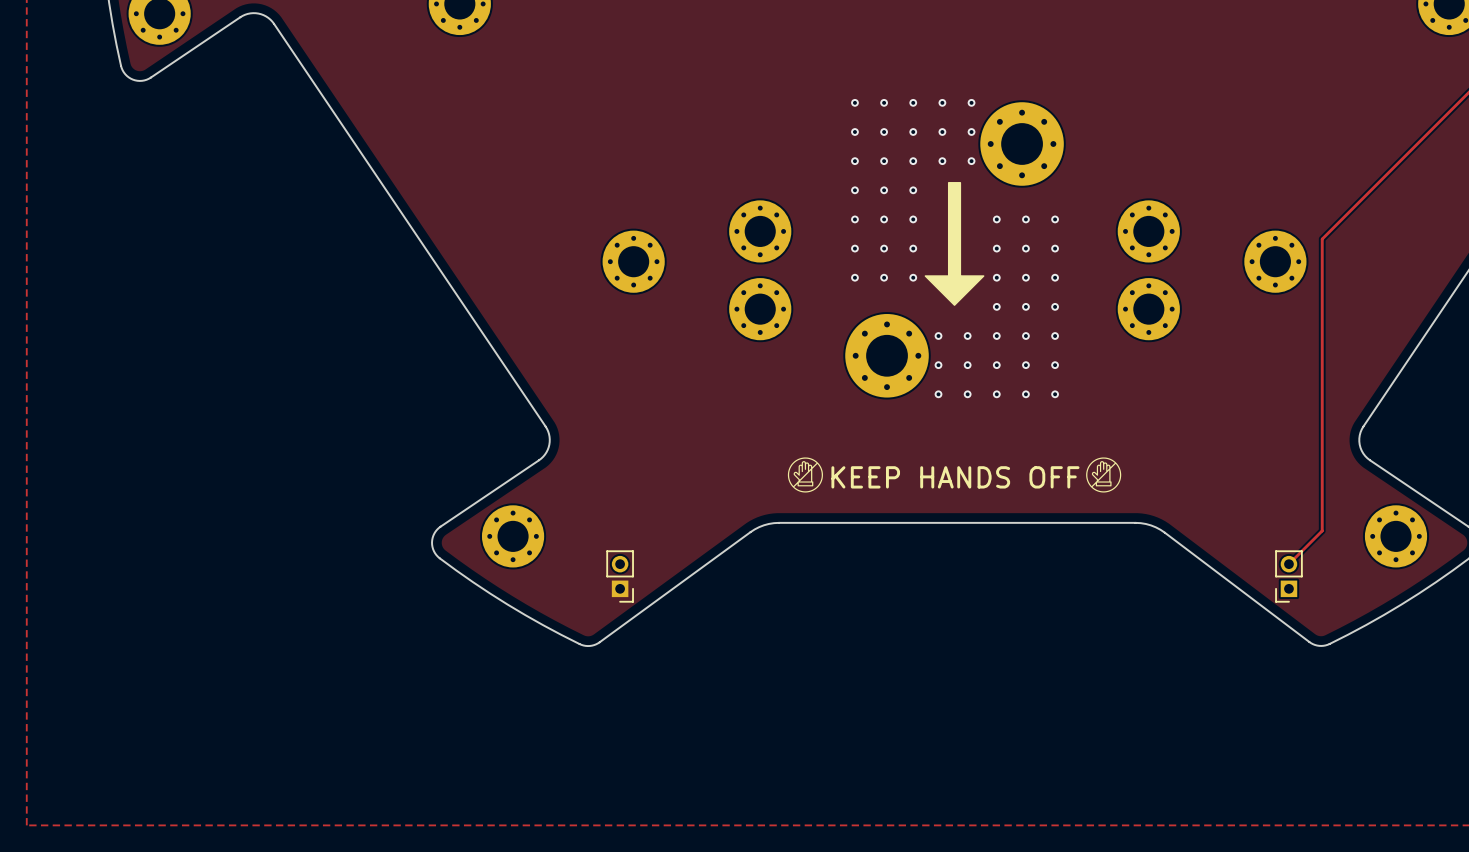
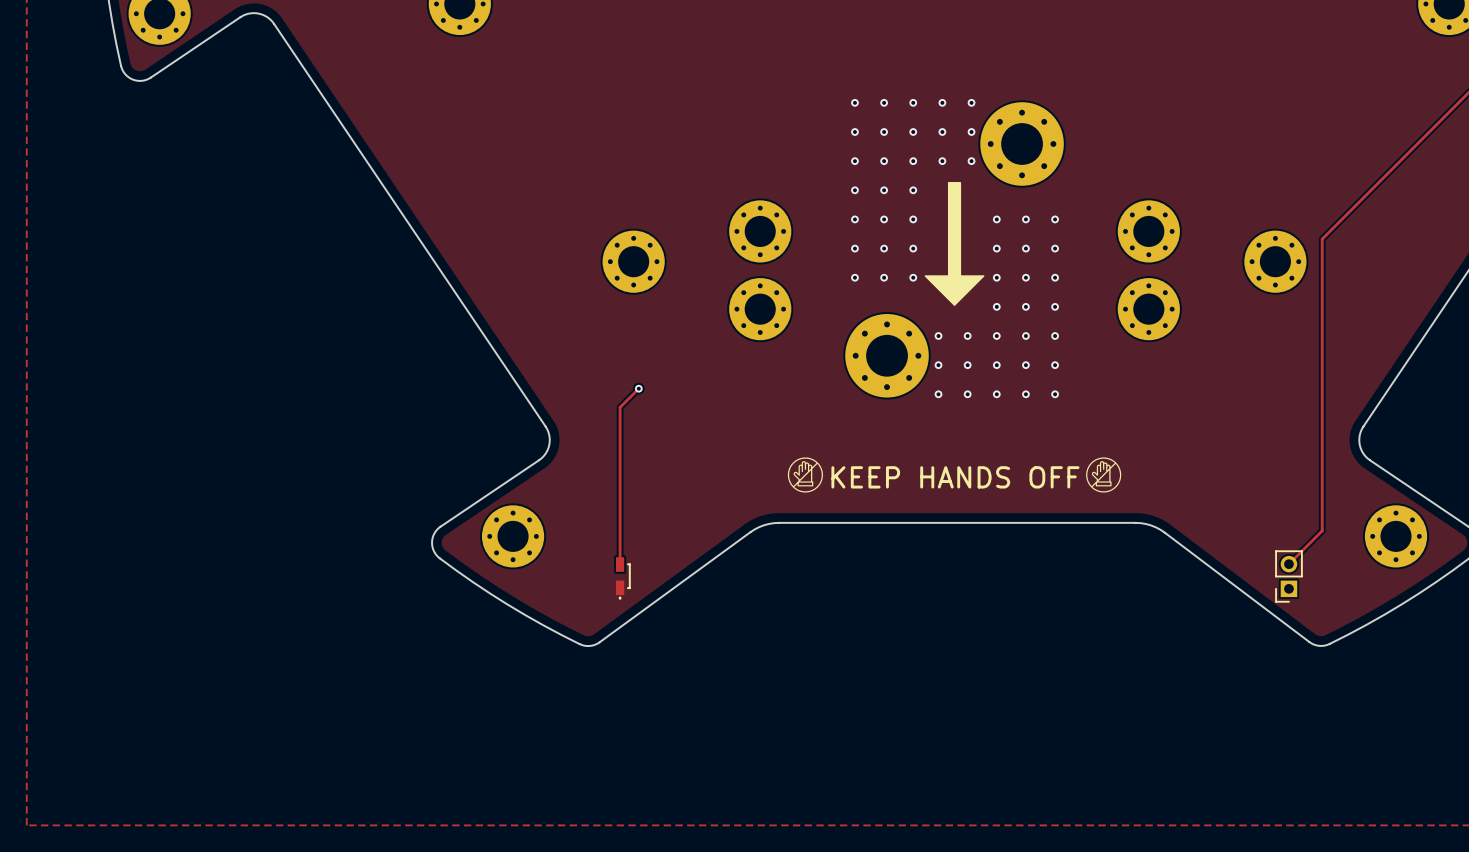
track: none -> (638, 388) (620, 407) (620, 564)
via: none -> (638, 388)
part footprint: [606, 550, 634, 603] -> [615, 557, 631, 600]

